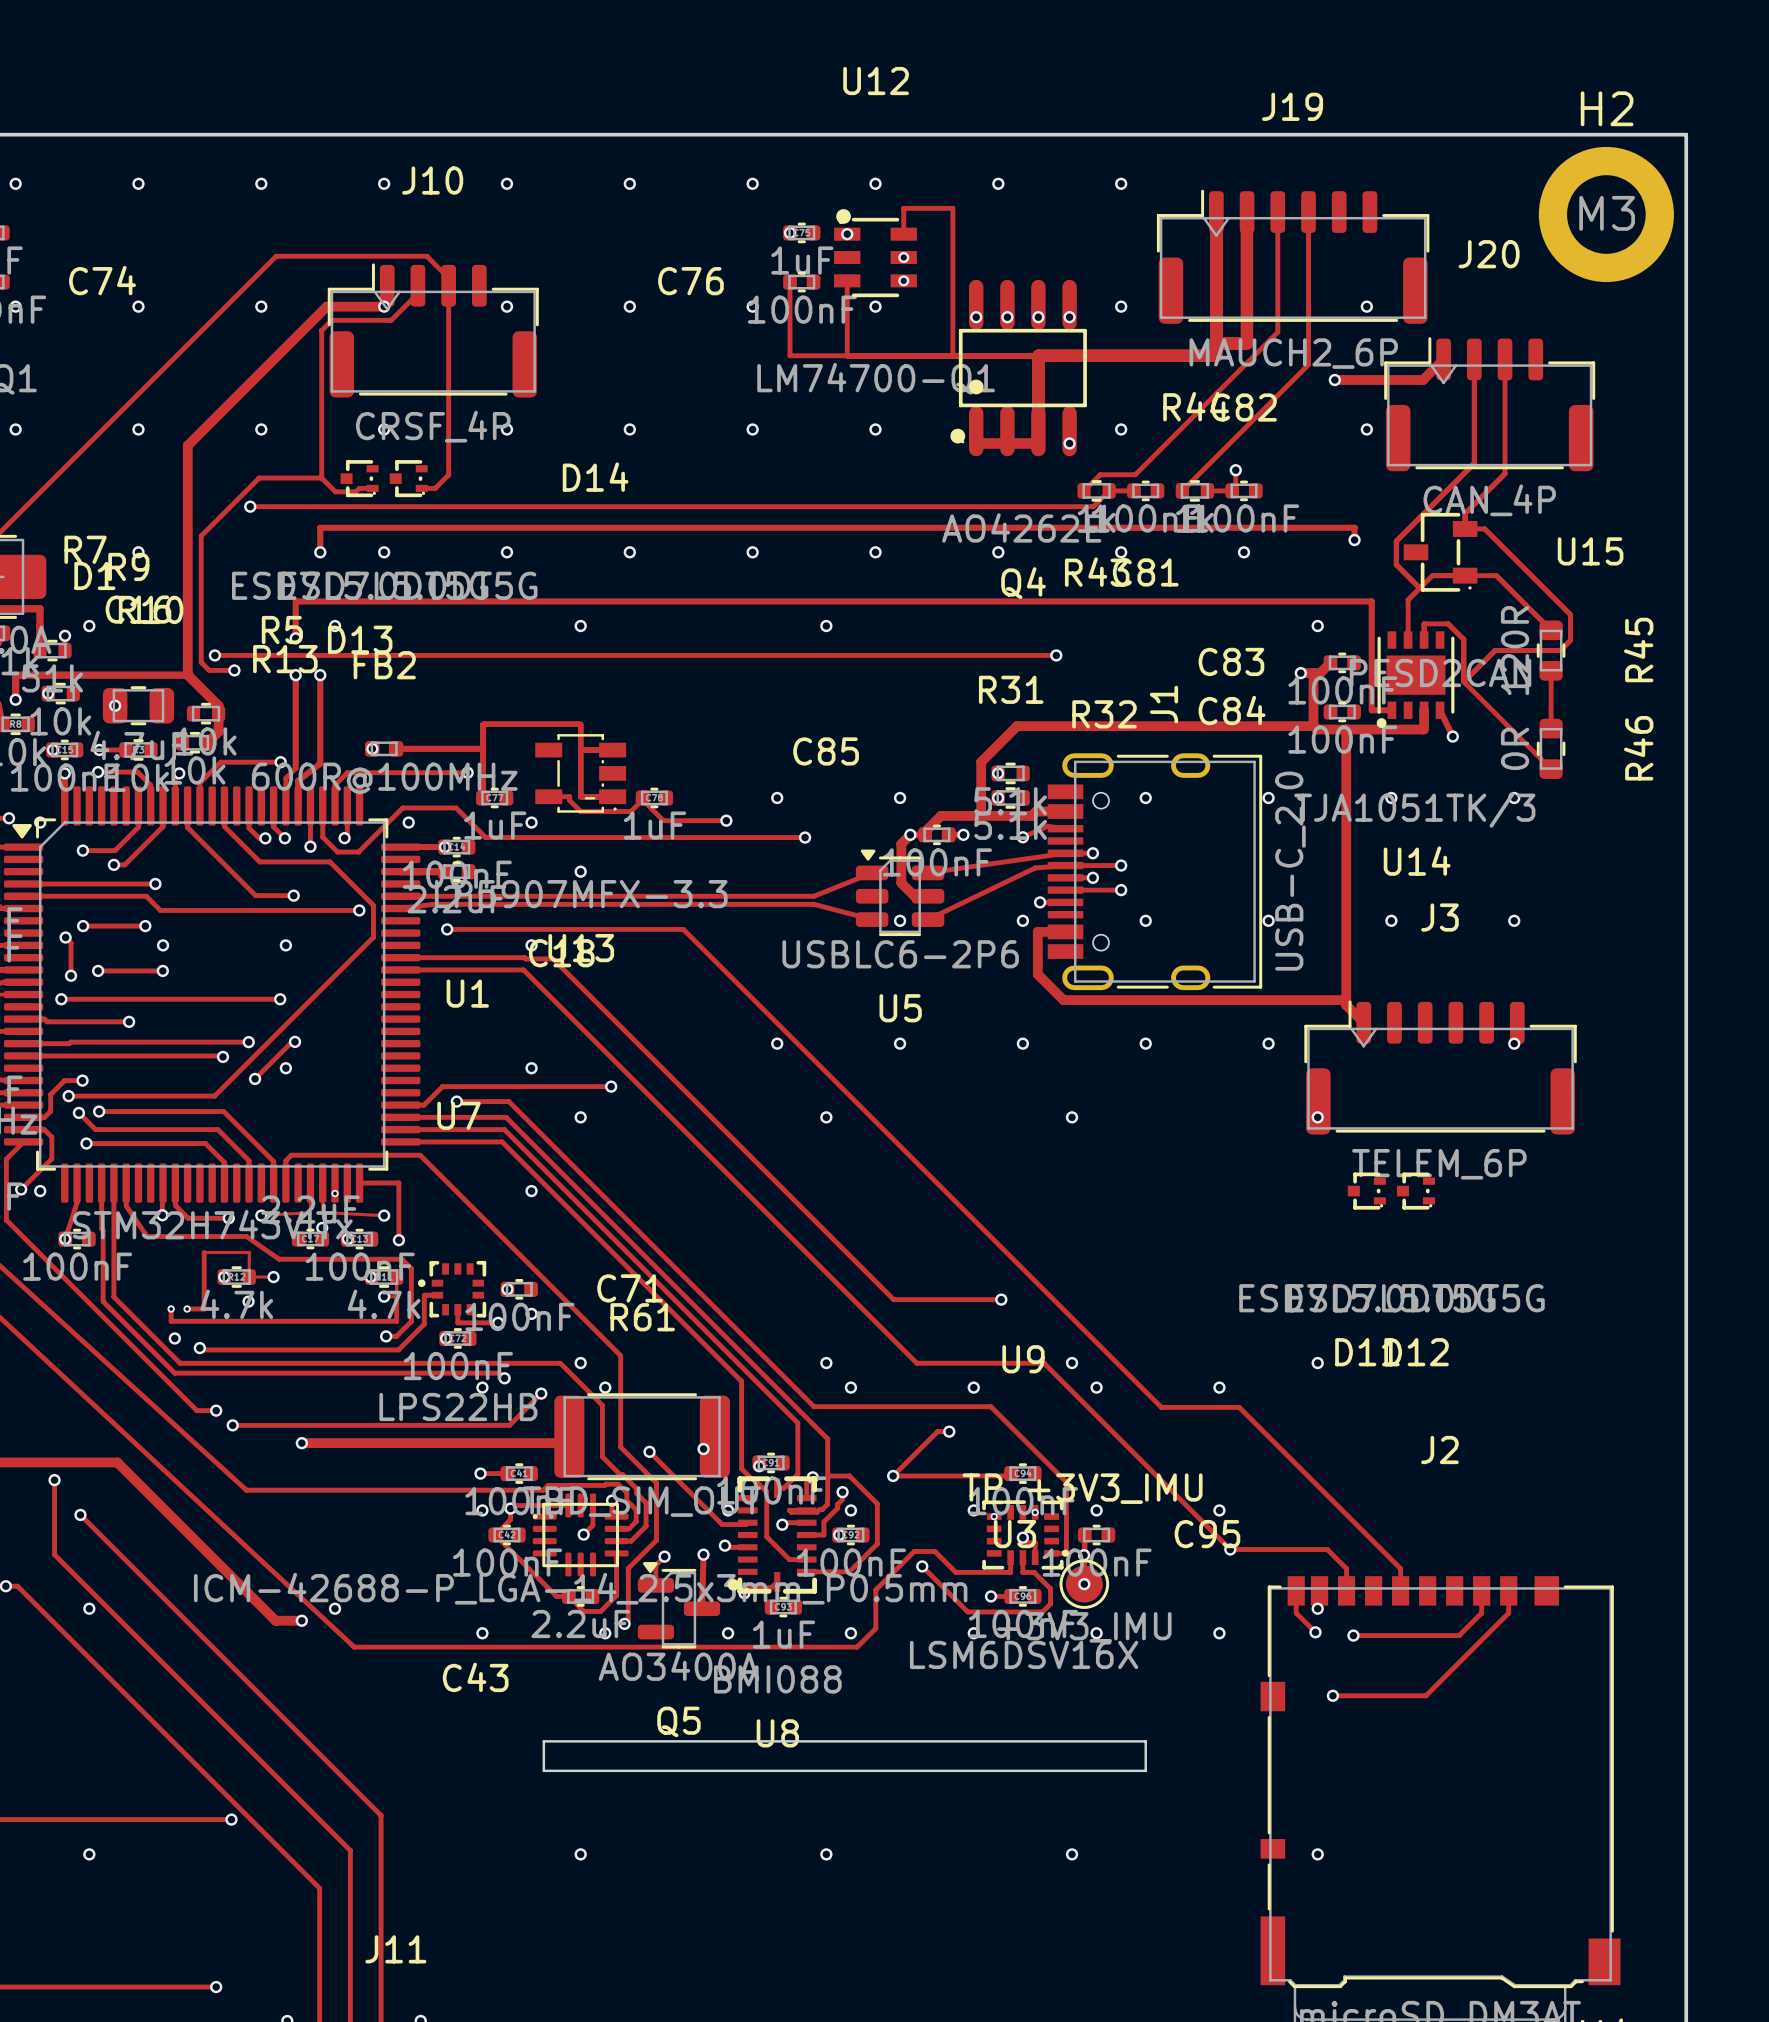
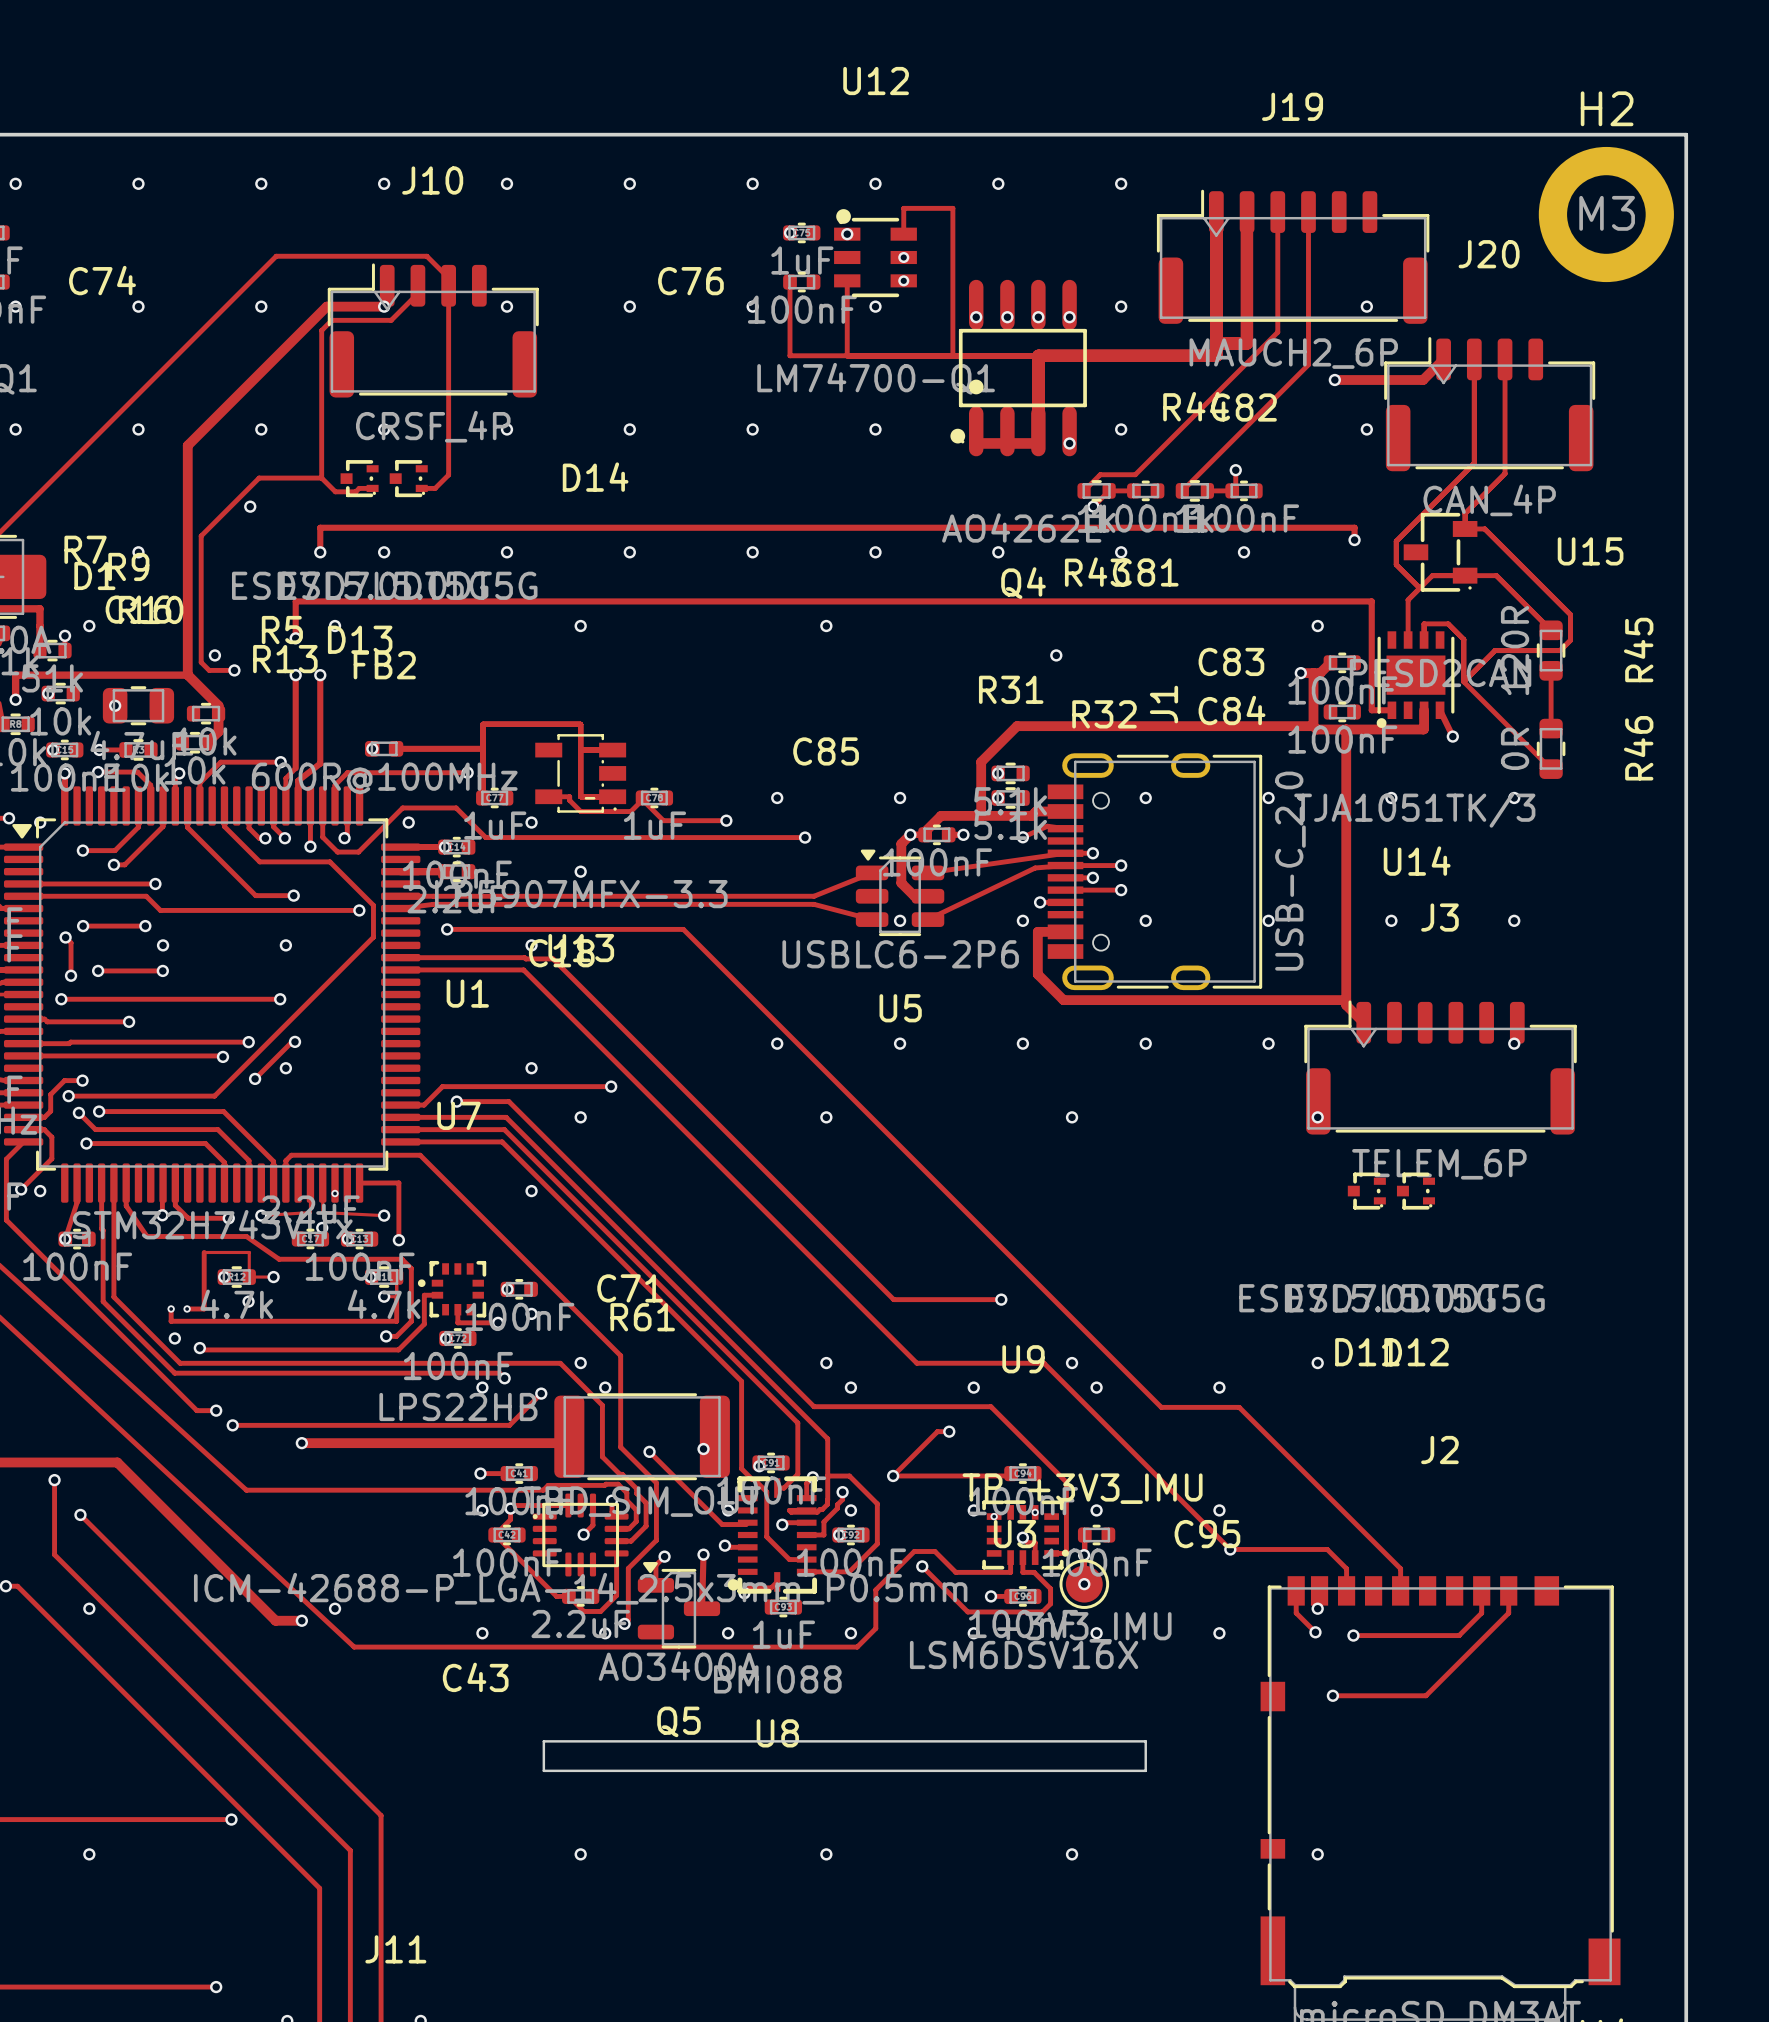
track: (250, 506) (1093, 506) -> none
via: none -> (1093, 506)
track: (214, 655) (1056, 655) -> none

